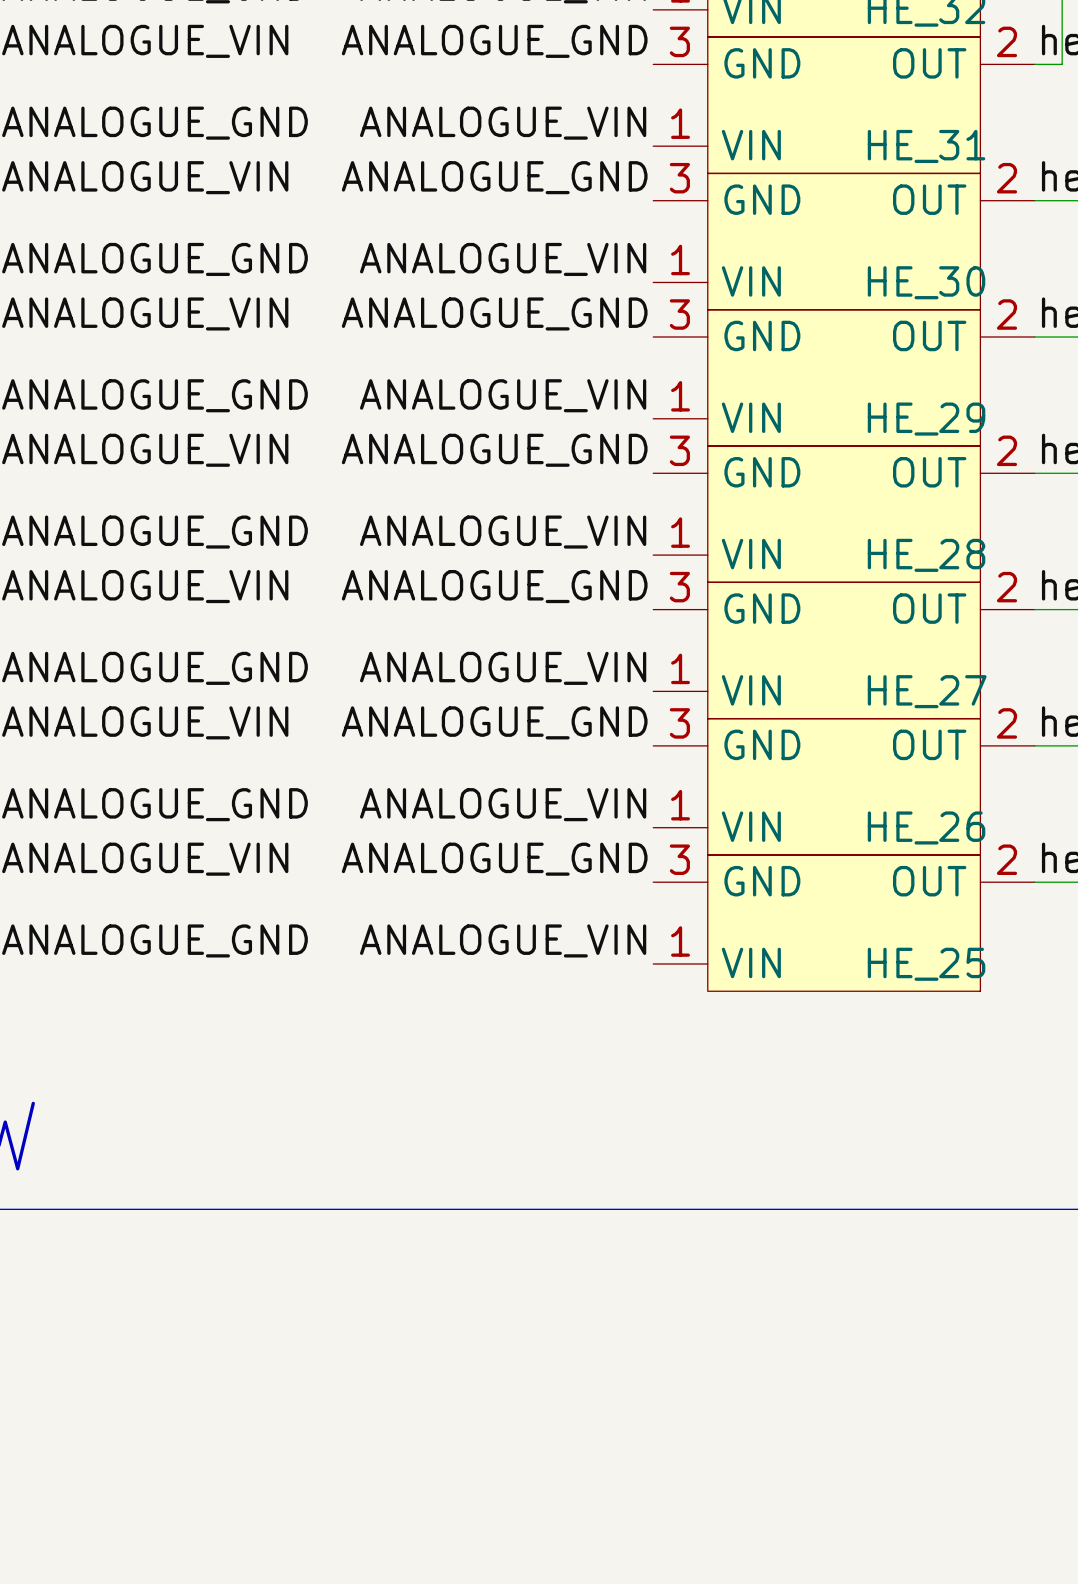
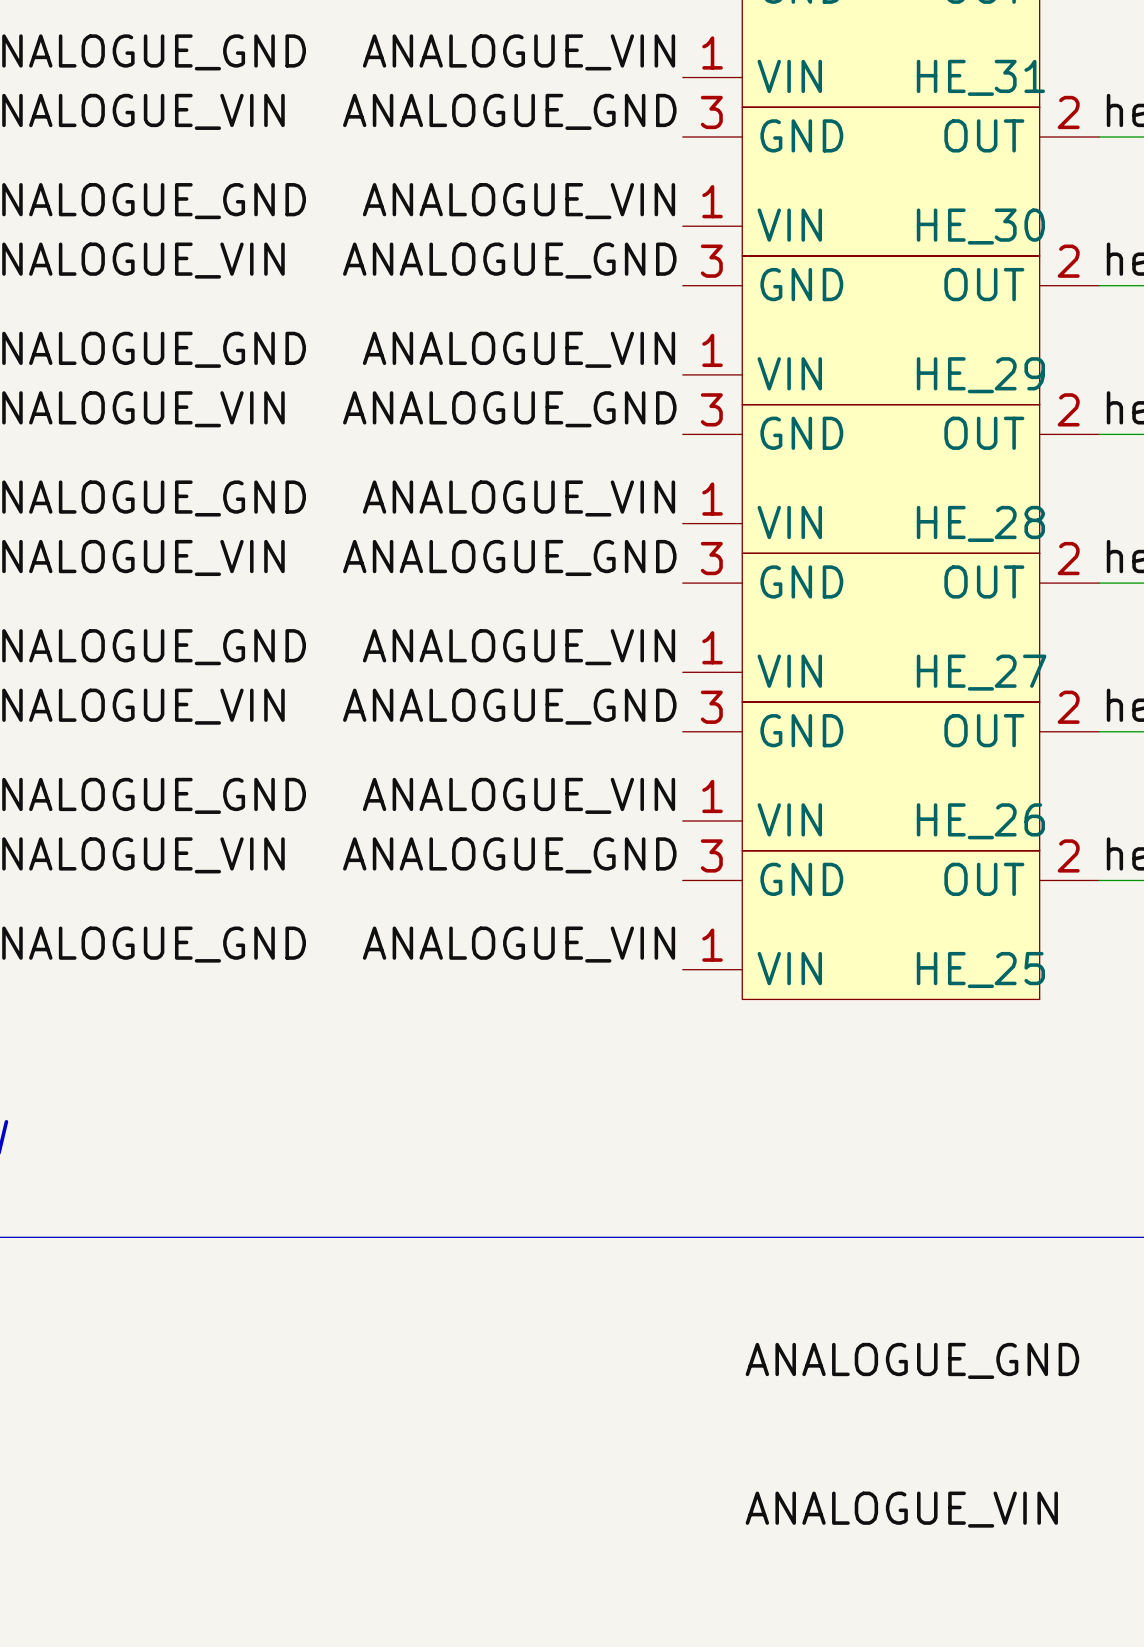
label: none -> ANALOGUE_GND (912, 1360)
label: none -> ANALOGUE_VIN (901, 1509)

